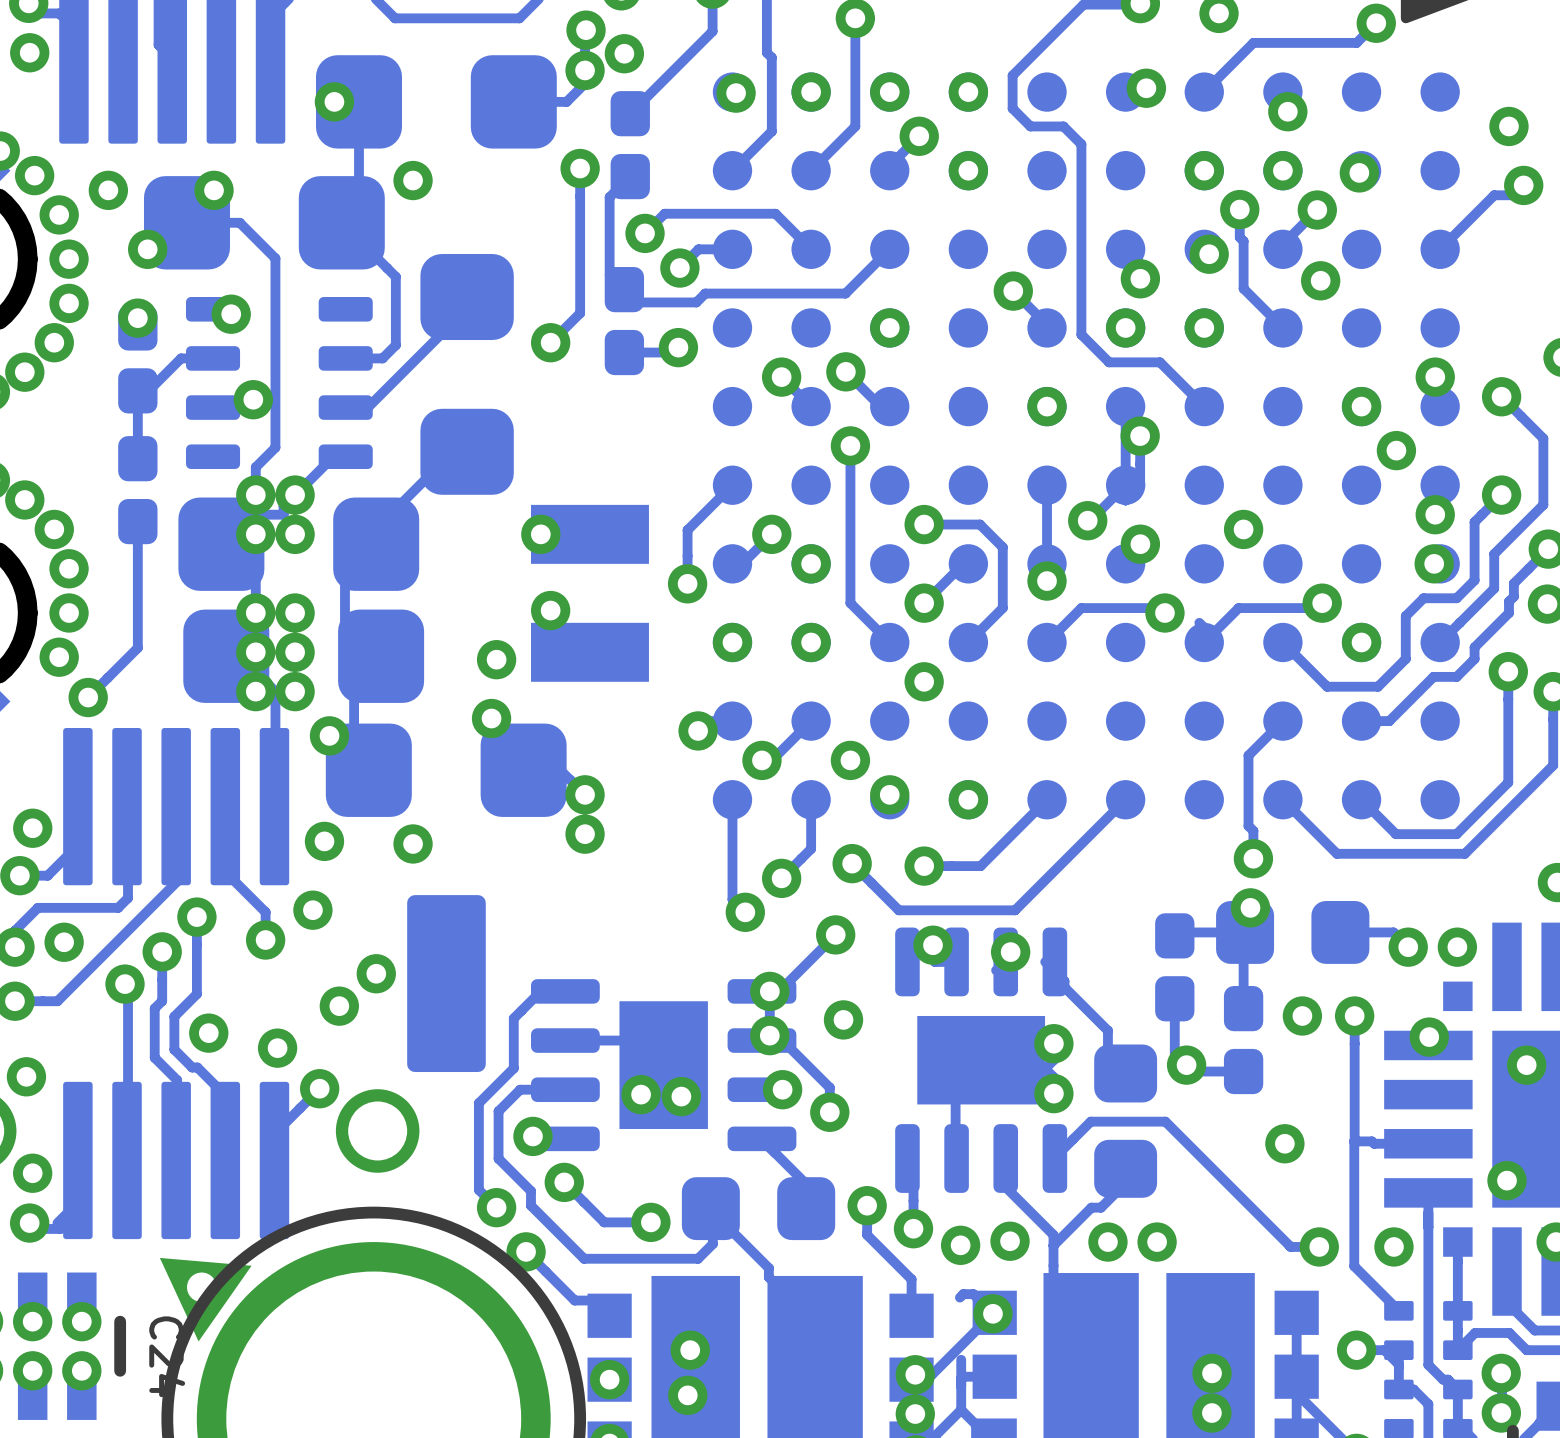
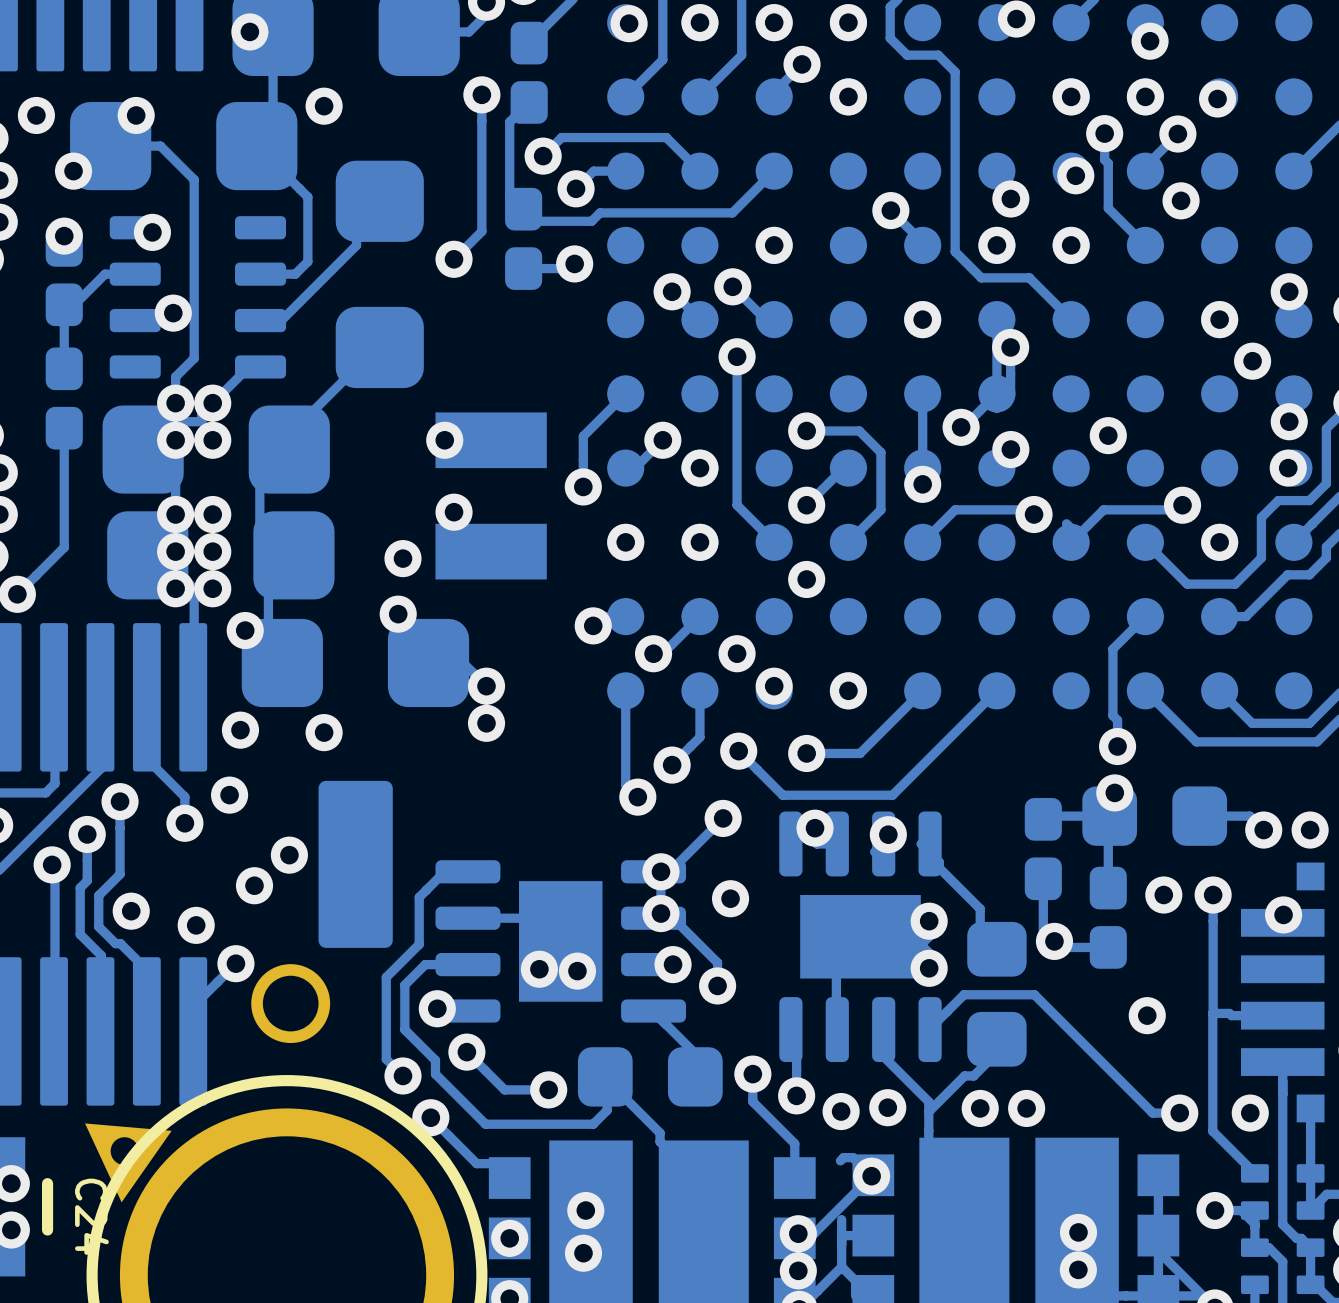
part position: (467, 374) -> (379, 274)

